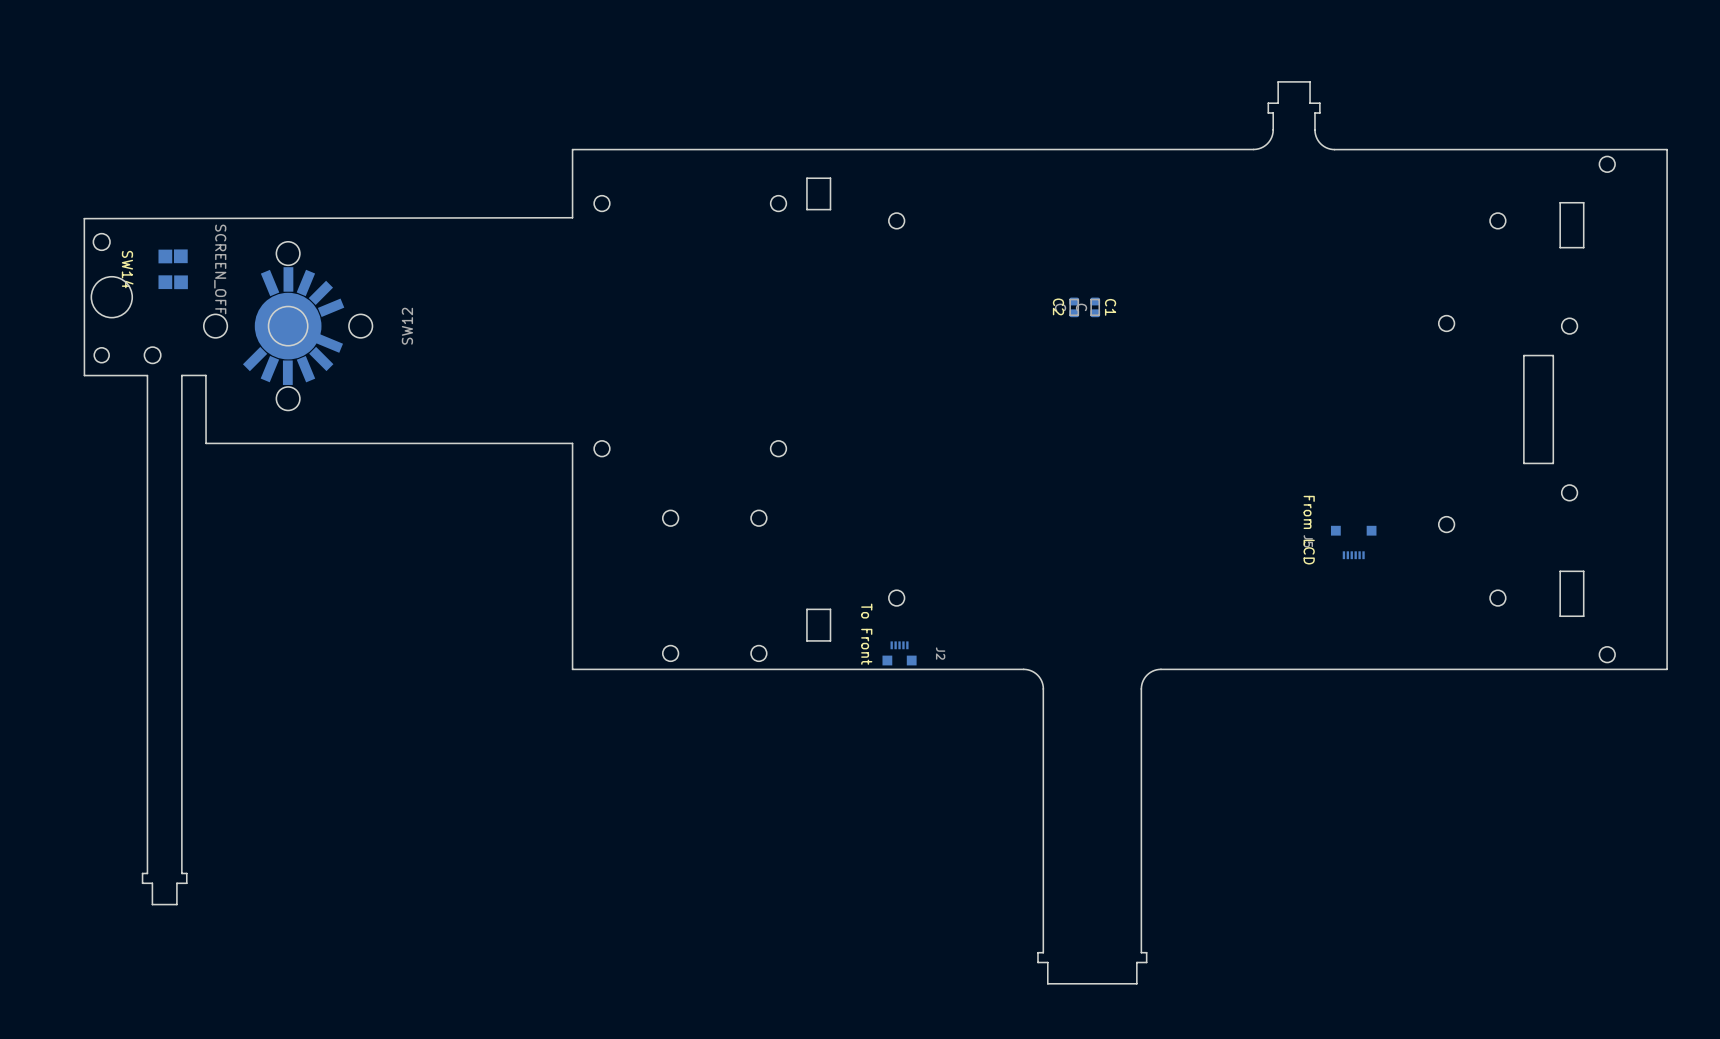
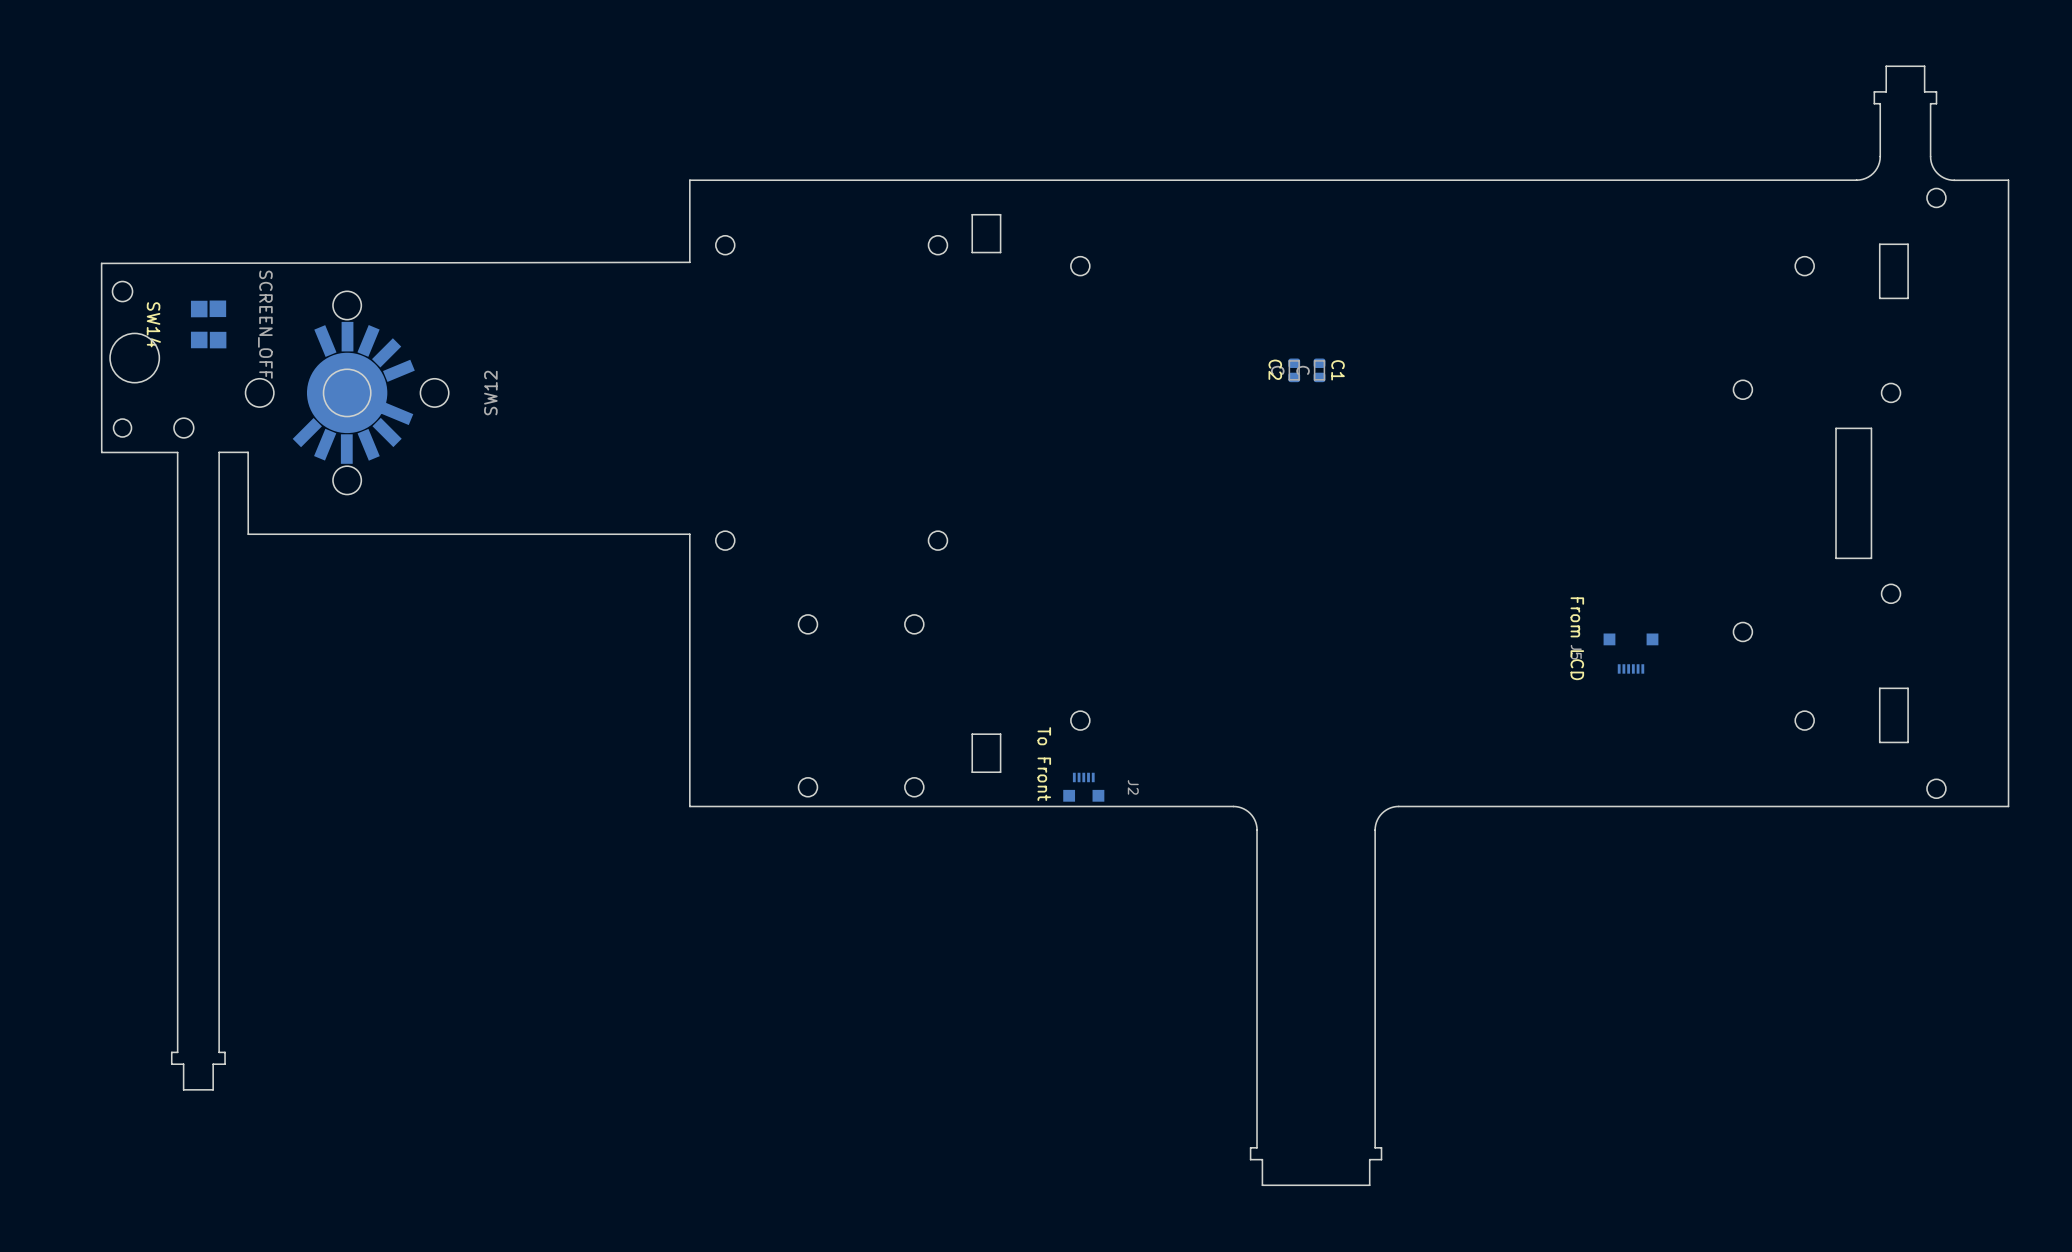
part: none -> (1905, 84)
part: (1294, 97) -> none
board edge: (1273, 113) (1273, 132) (1270, 139) (1263, 146) (1253, 149) (572, 149) -> (1880, 103) (1879, 162) (1871, 175) (1856, 180) (689, 180)
board edge: (1314, 113) (1316, 138) (1324, 146) (1332, 149) (1667, 149) -> (1930, 103) (1930, 159) (1937, 173) (1951, 180) (2008, 180)

